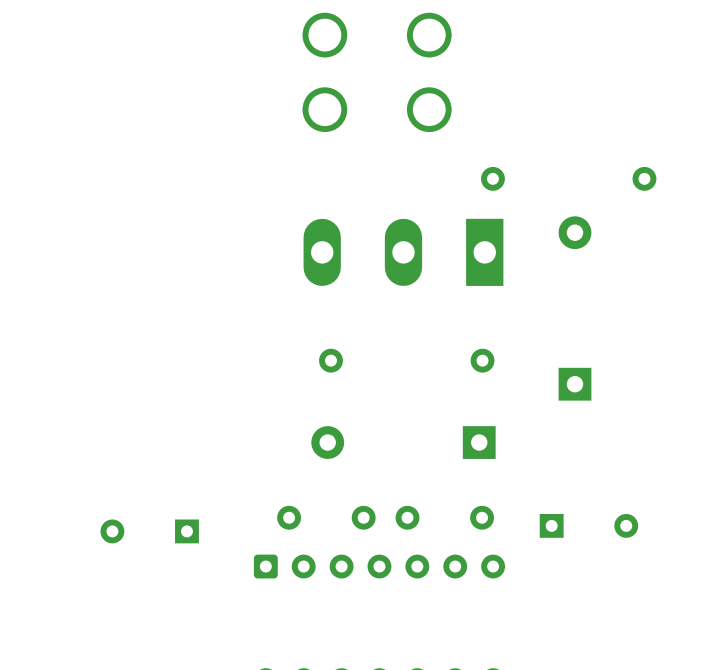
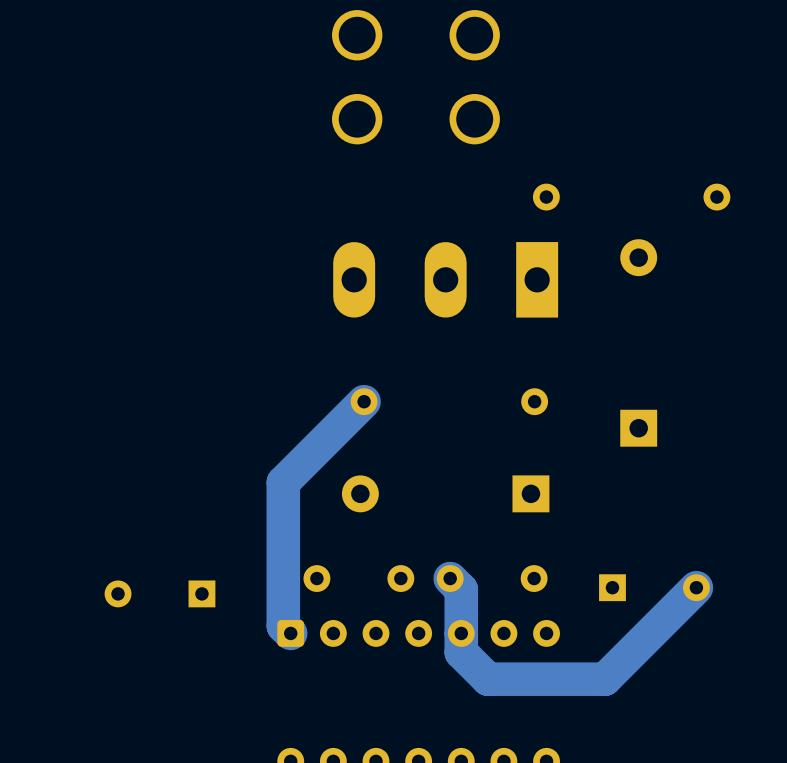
track: none -> (364, 401) (283, 482) (283, 626) (290, 633)
track: none -> (450, 578) (461, 589) (461, 652) (488, 679) (604, 679) (696, 587)

